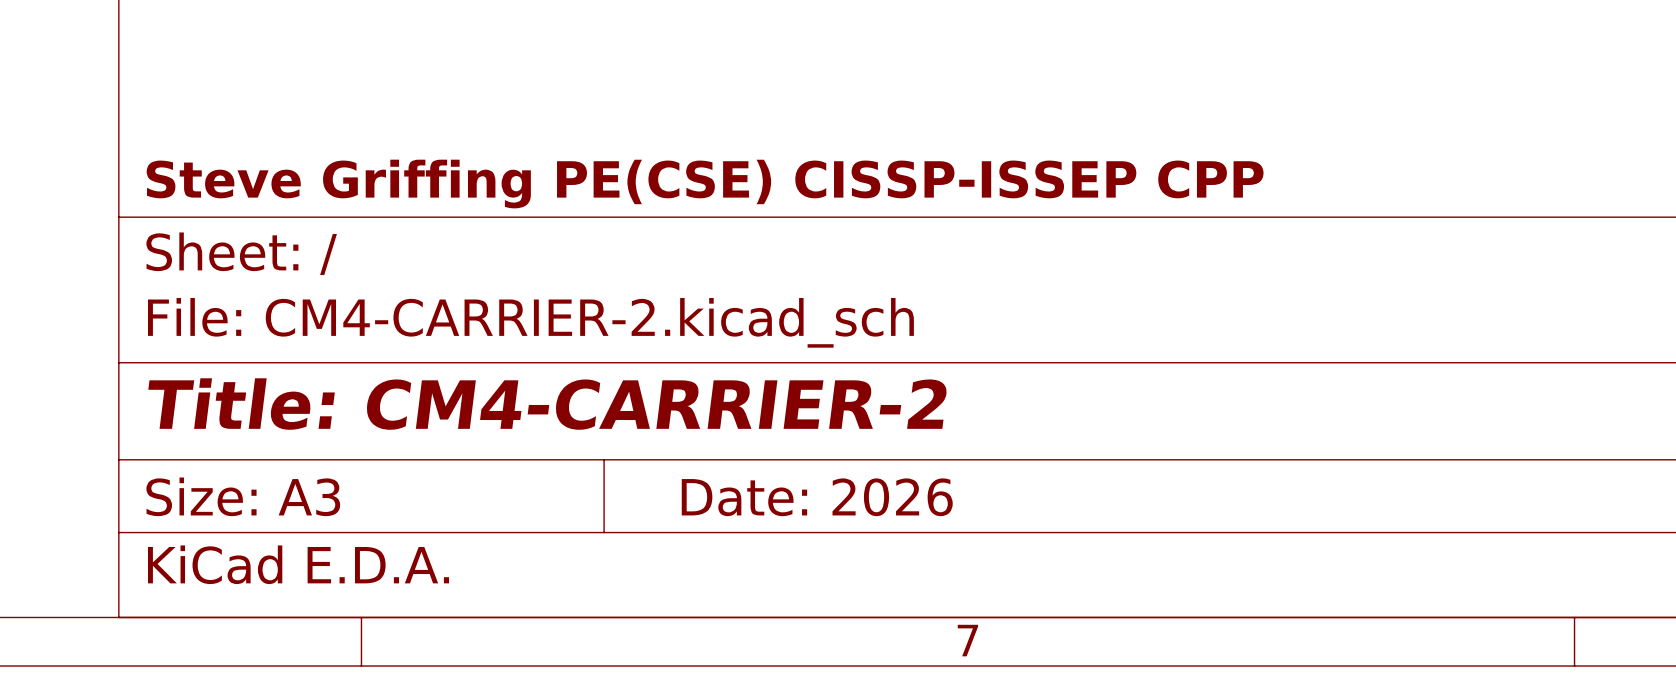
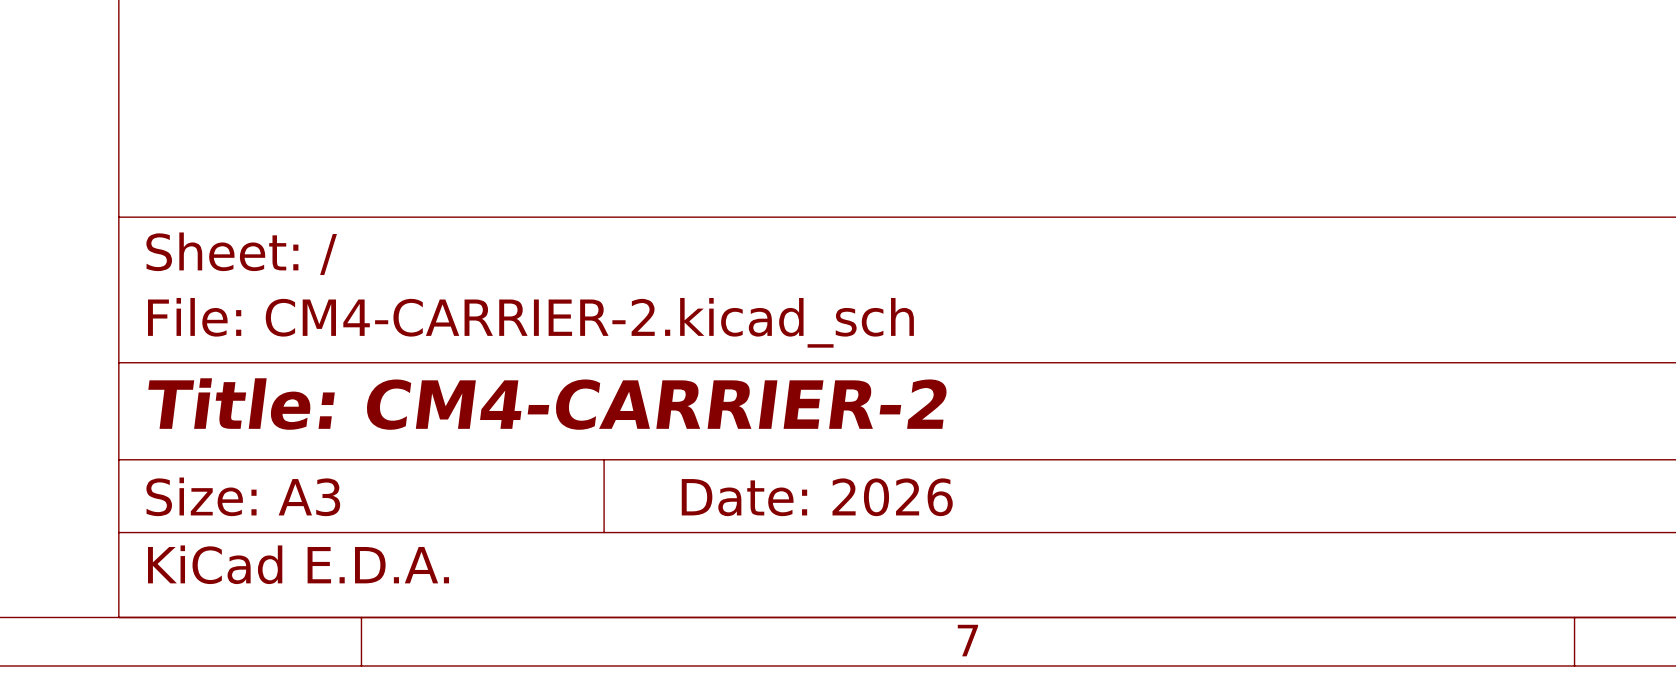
title block: Steve Griffing PE(CSE) CISSP-ISSEP CPP (705, 184) -> none

